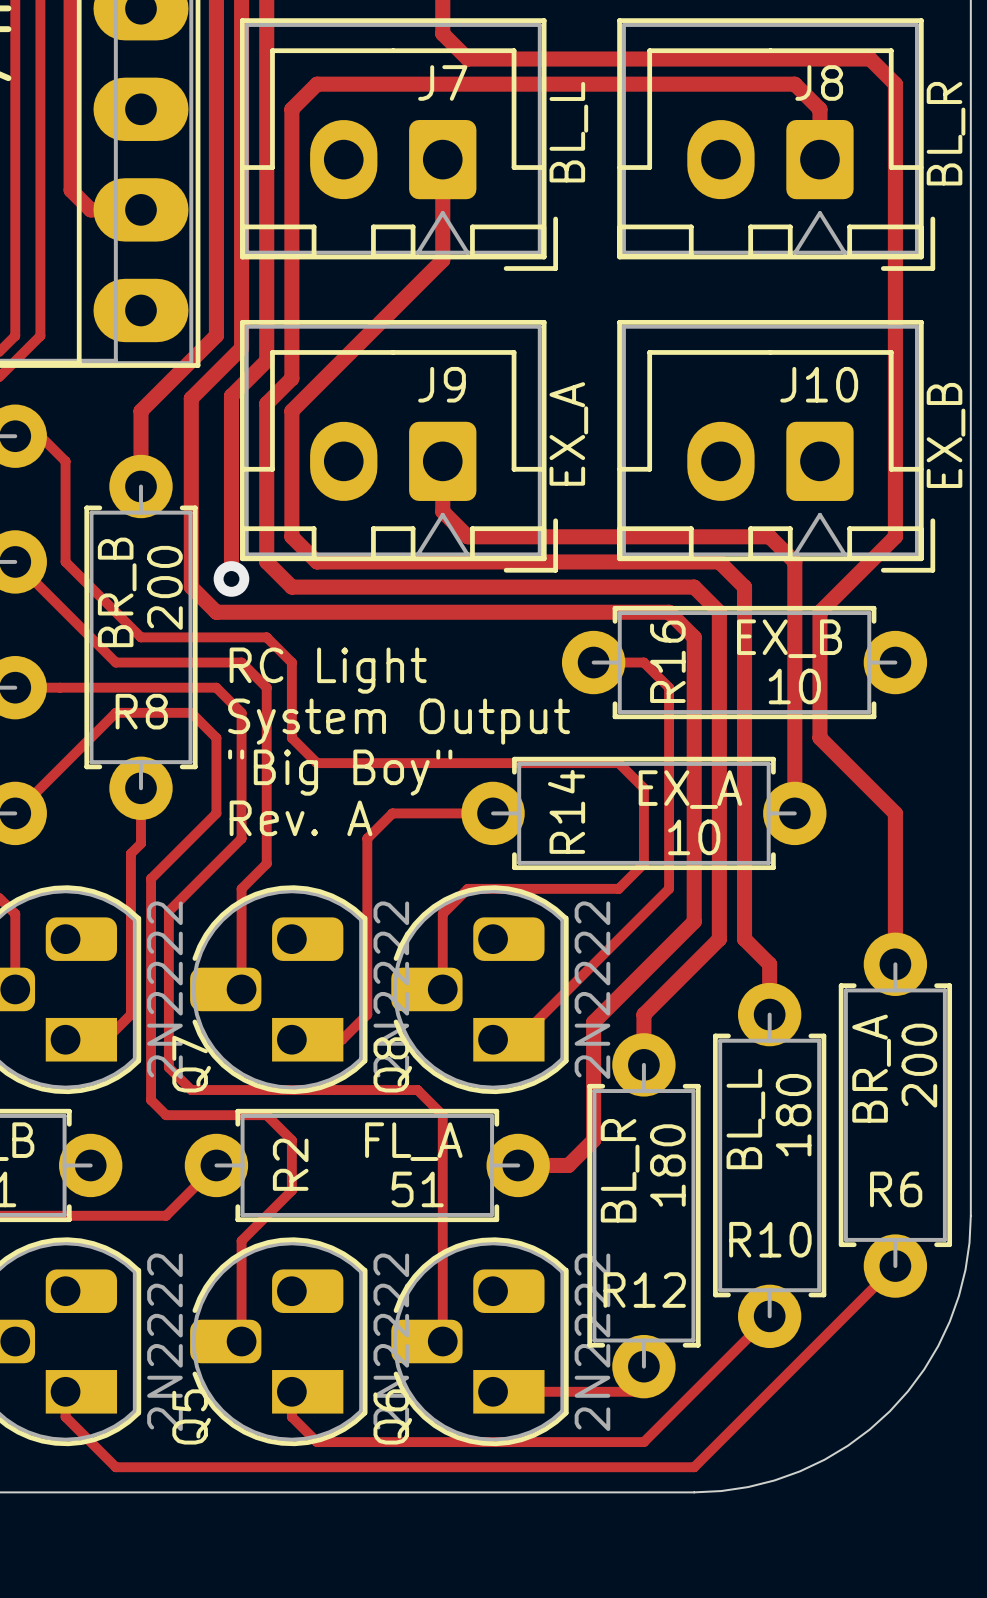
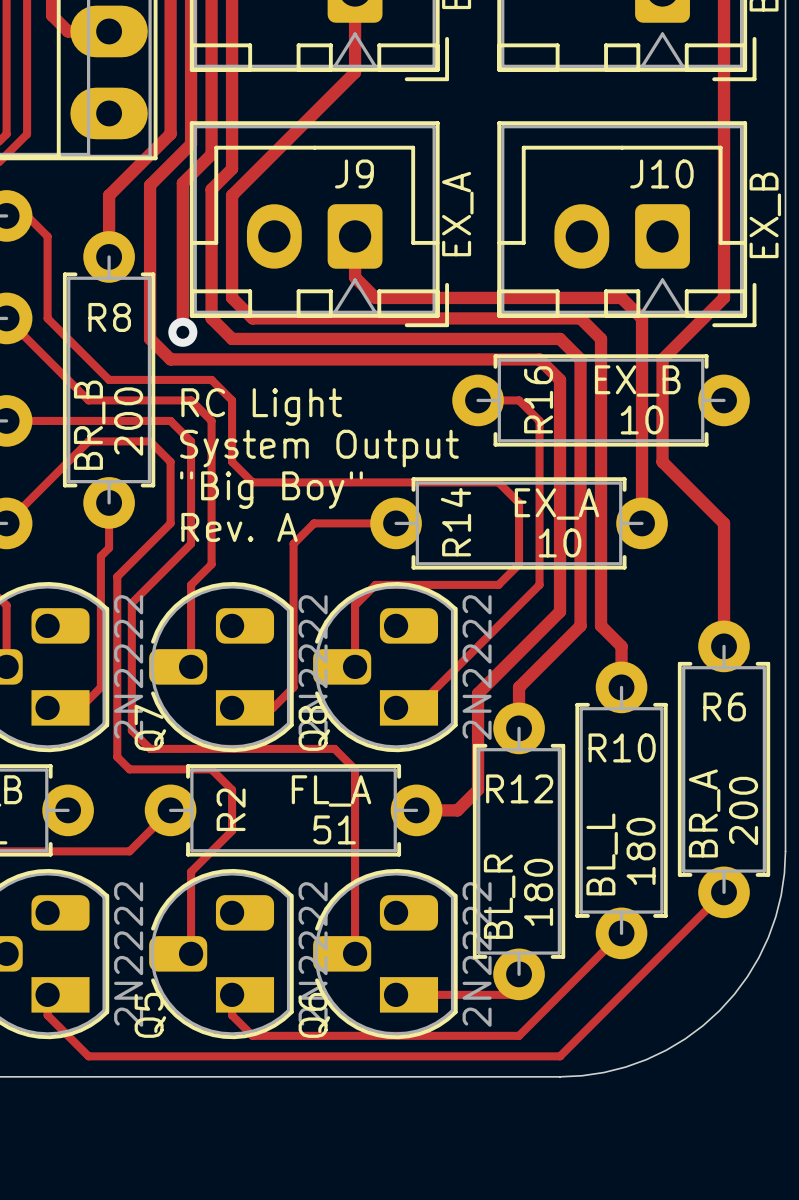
R8 value position: 200 (164, 587) -> 200 (128, 421)
text position: BR_B (117, 592) -> BR_B (89, 425)
R8 name position: R8 (141, 711) -> R8 (109, 317)
R6 value position: 200 (919, 1065) -> 200 (743, 810)
text position: BR_A (871, 1068) -> BR_A (704, 813)
R10 value position: 180 (793, 1115) -> 180 (641, 851)
text position: BL_L (745, 1118) -> BL_L (602, 854)
R12 value position: 180 (667, 1165) -> 180 (538, 892)
text position: BL_R (620, 1170) -> BL_R (499, 896)
R6 name position: R6 (896, 1189) -> R6 (724, 706)
R10 name position: R10 (770, 1239) -> R10 (622, 747)
R12 name position: R12 (644, 1290) -> R12 (519, 788)

